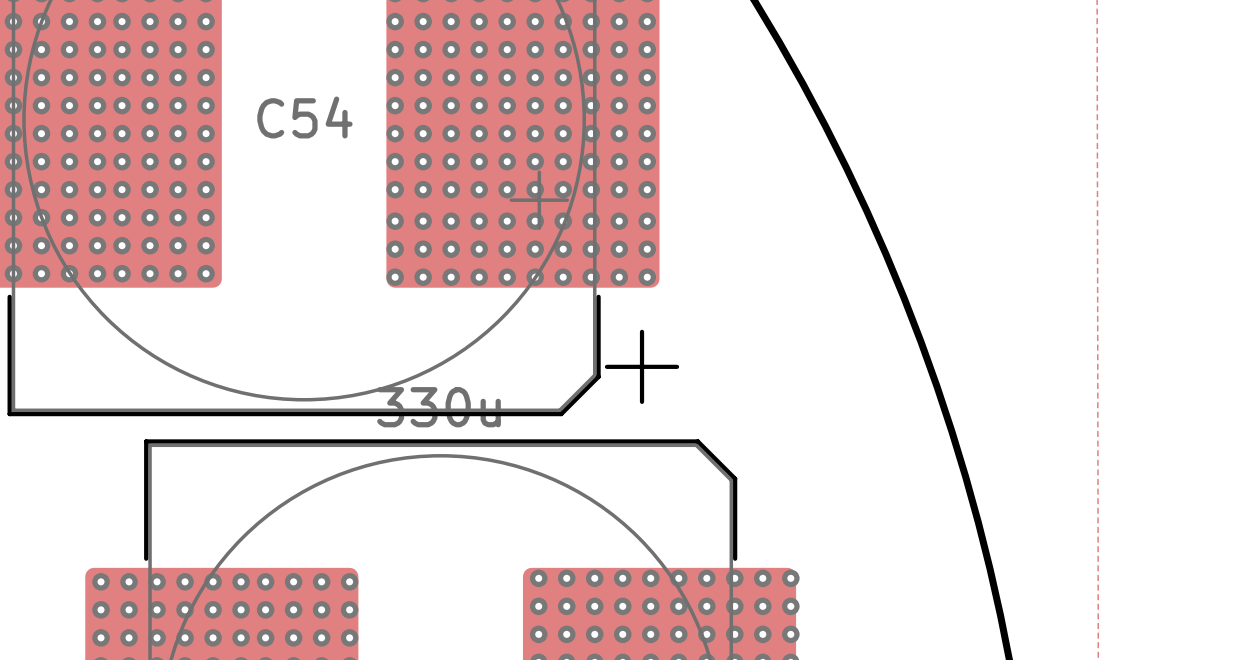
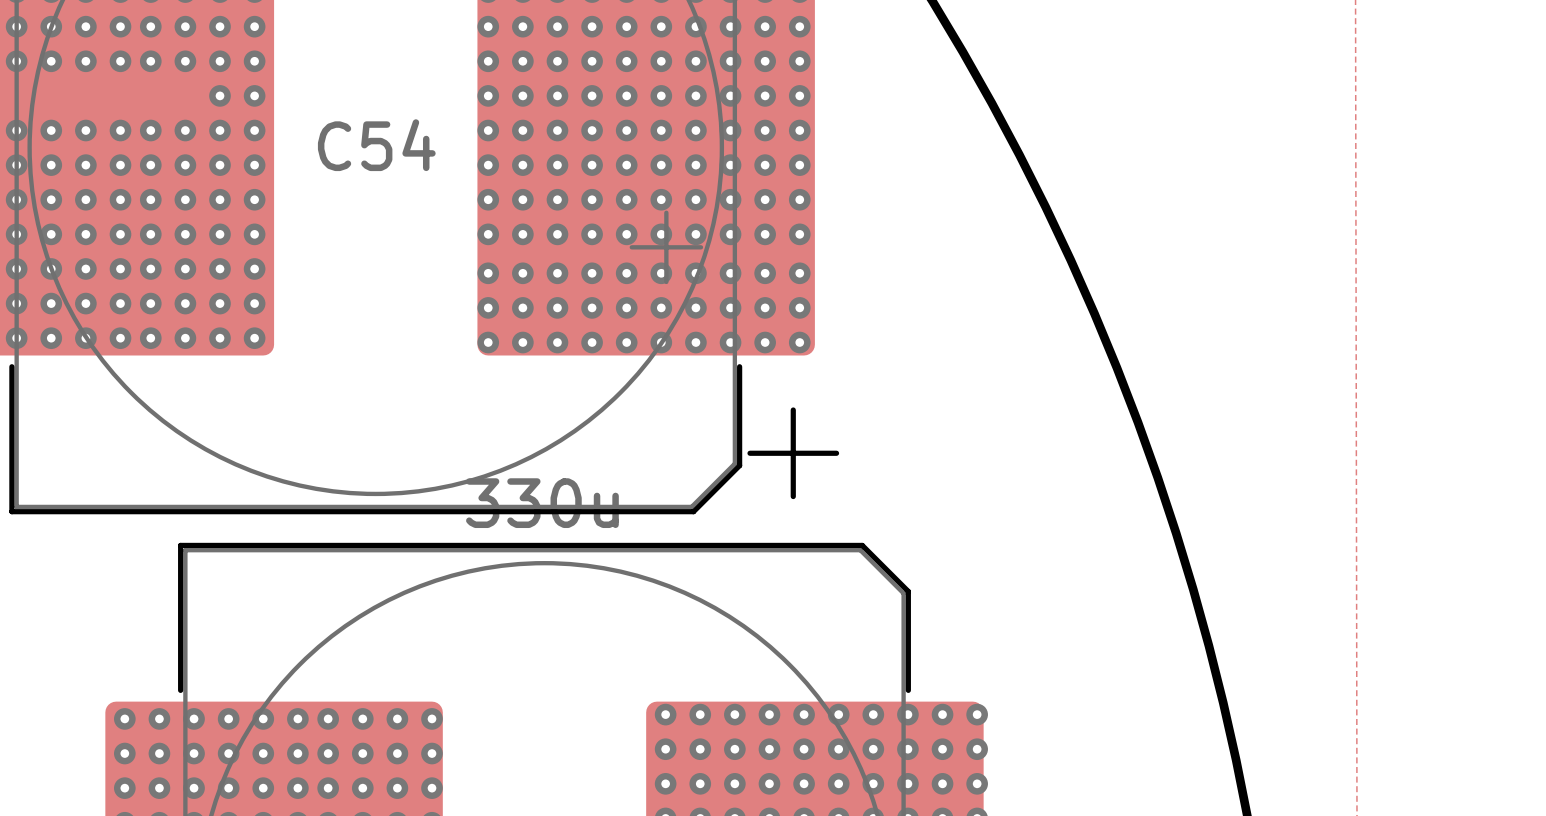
via: (13, 77) -> none
via: (41, 77) -> none
via: (69, 77) -> none
via: (97, 77) -> none
via: (122, 77) -> none
via: (150, 77) -> none

